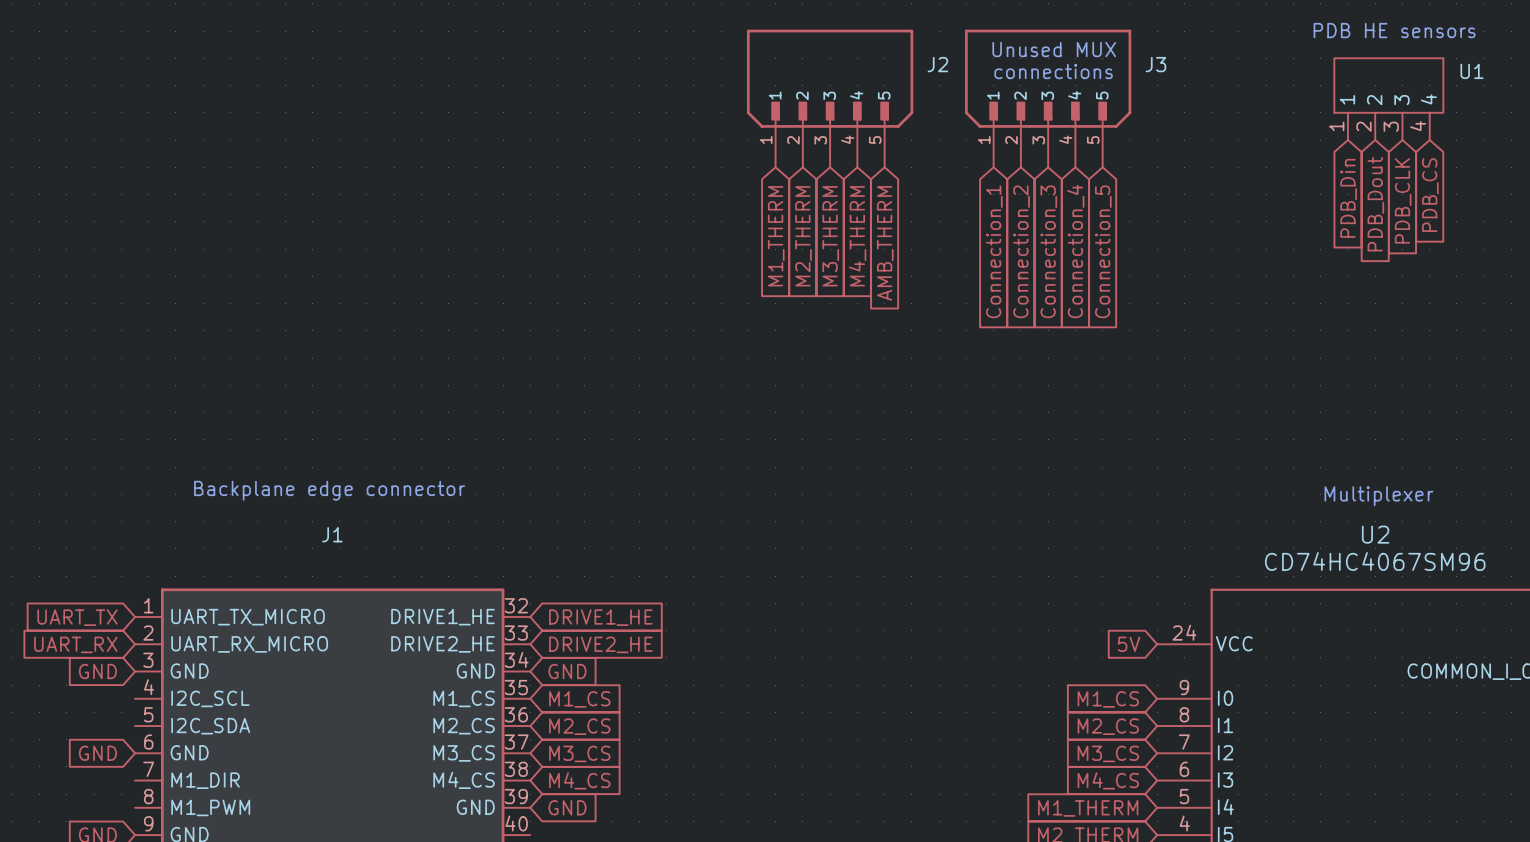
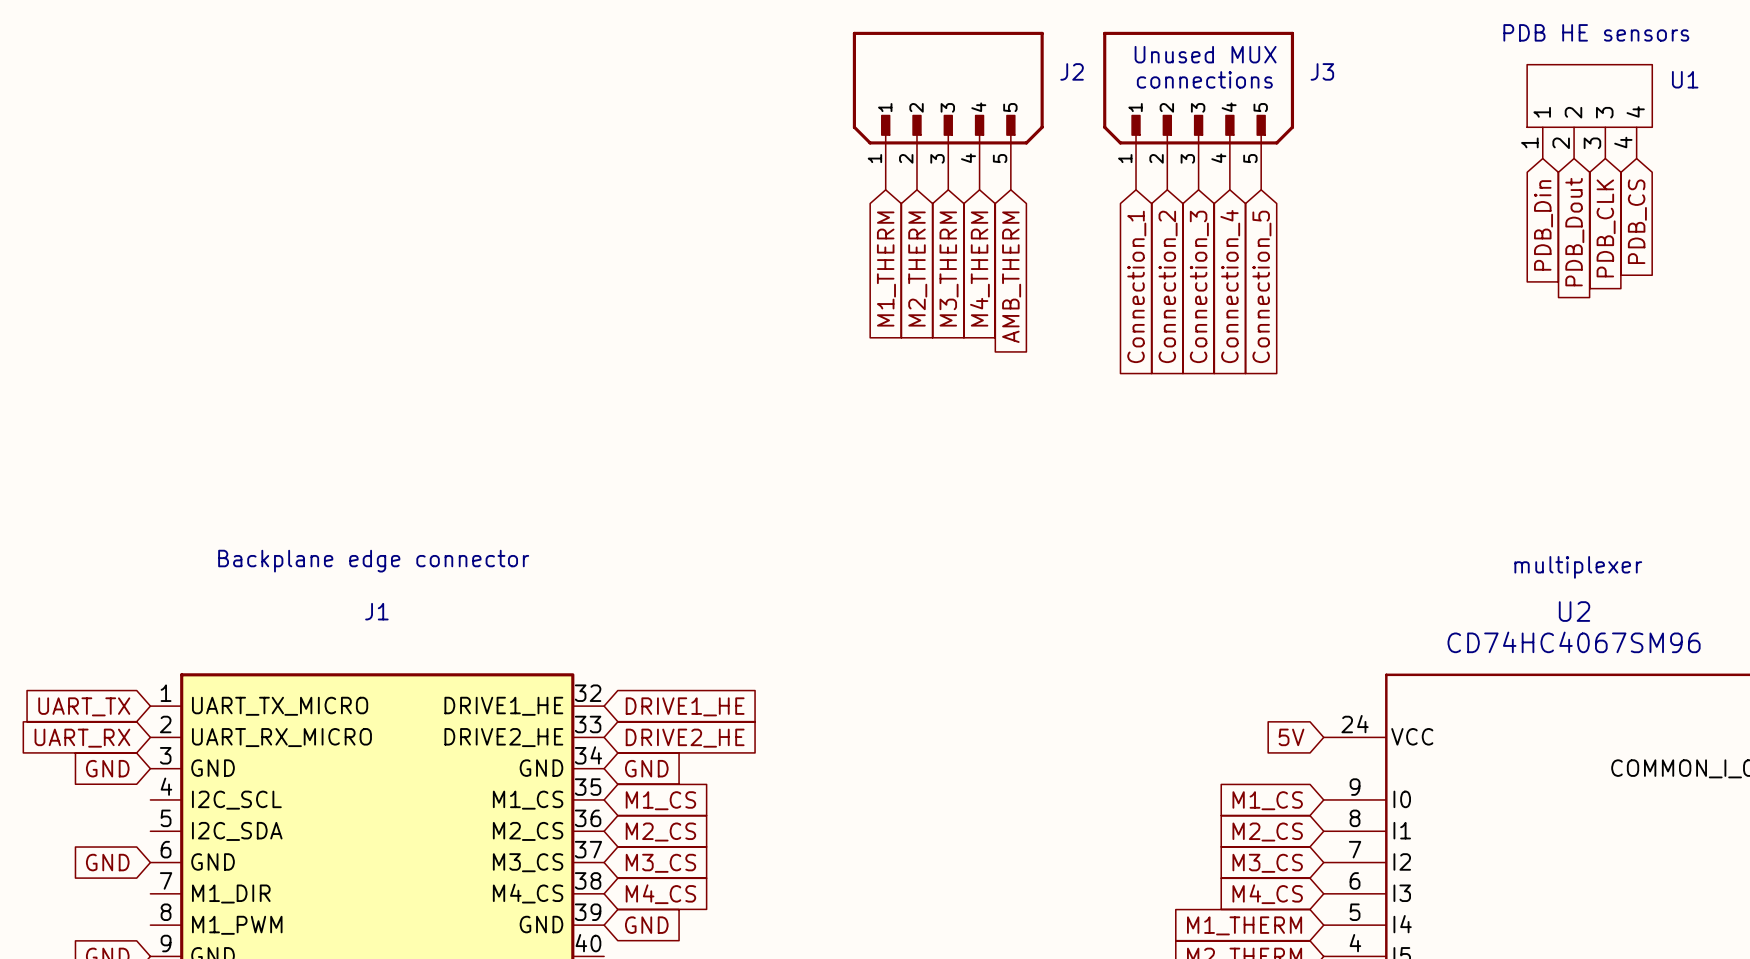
text: Multiplexer (1378, 496) -> multiplexer (1578, 567)

